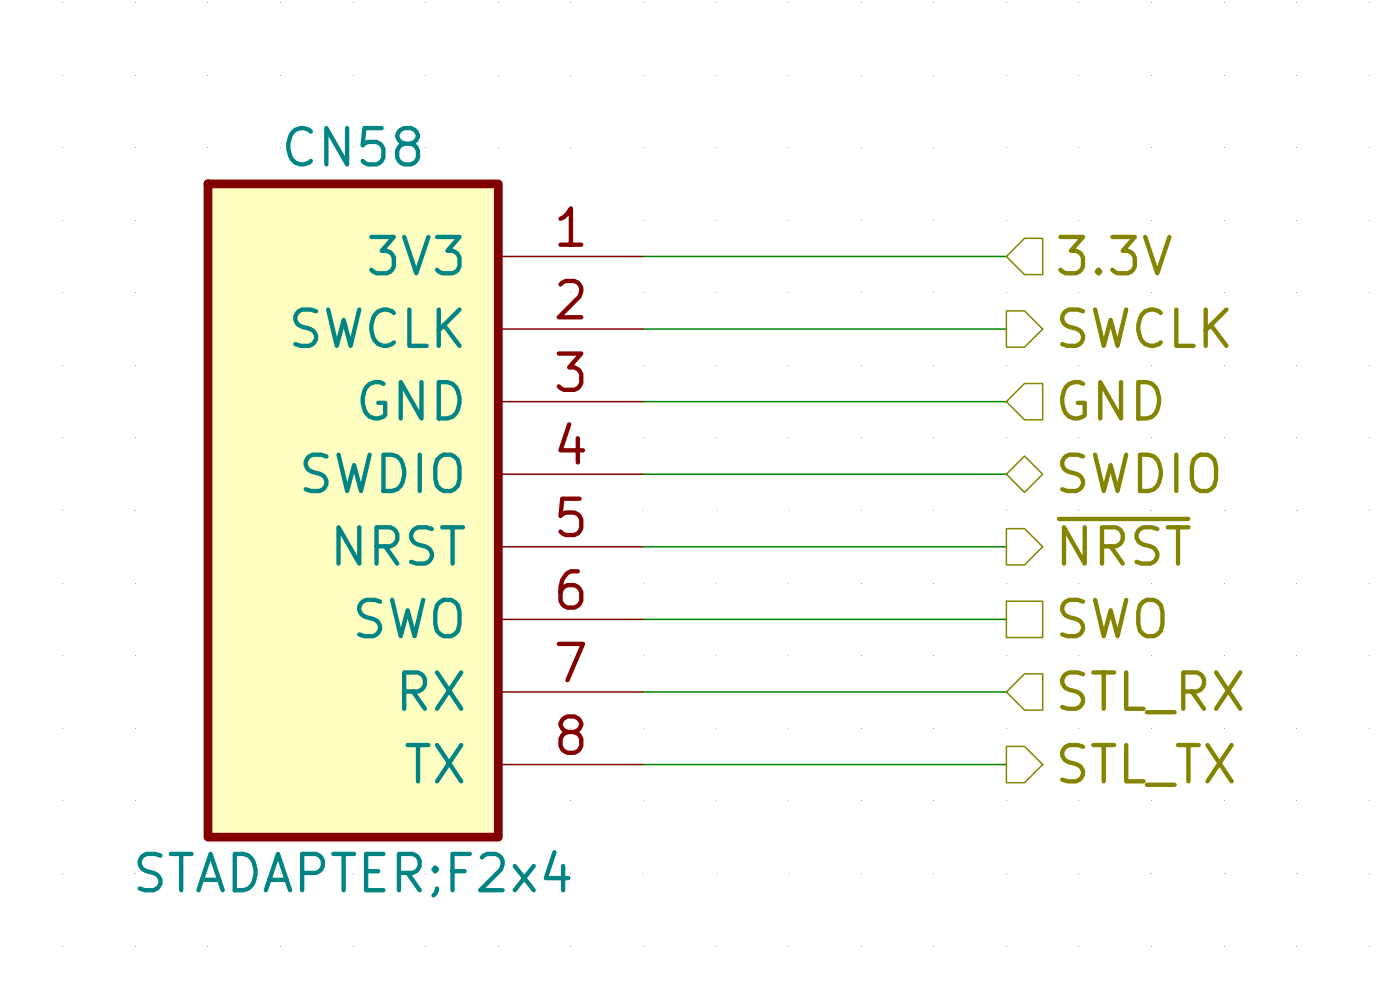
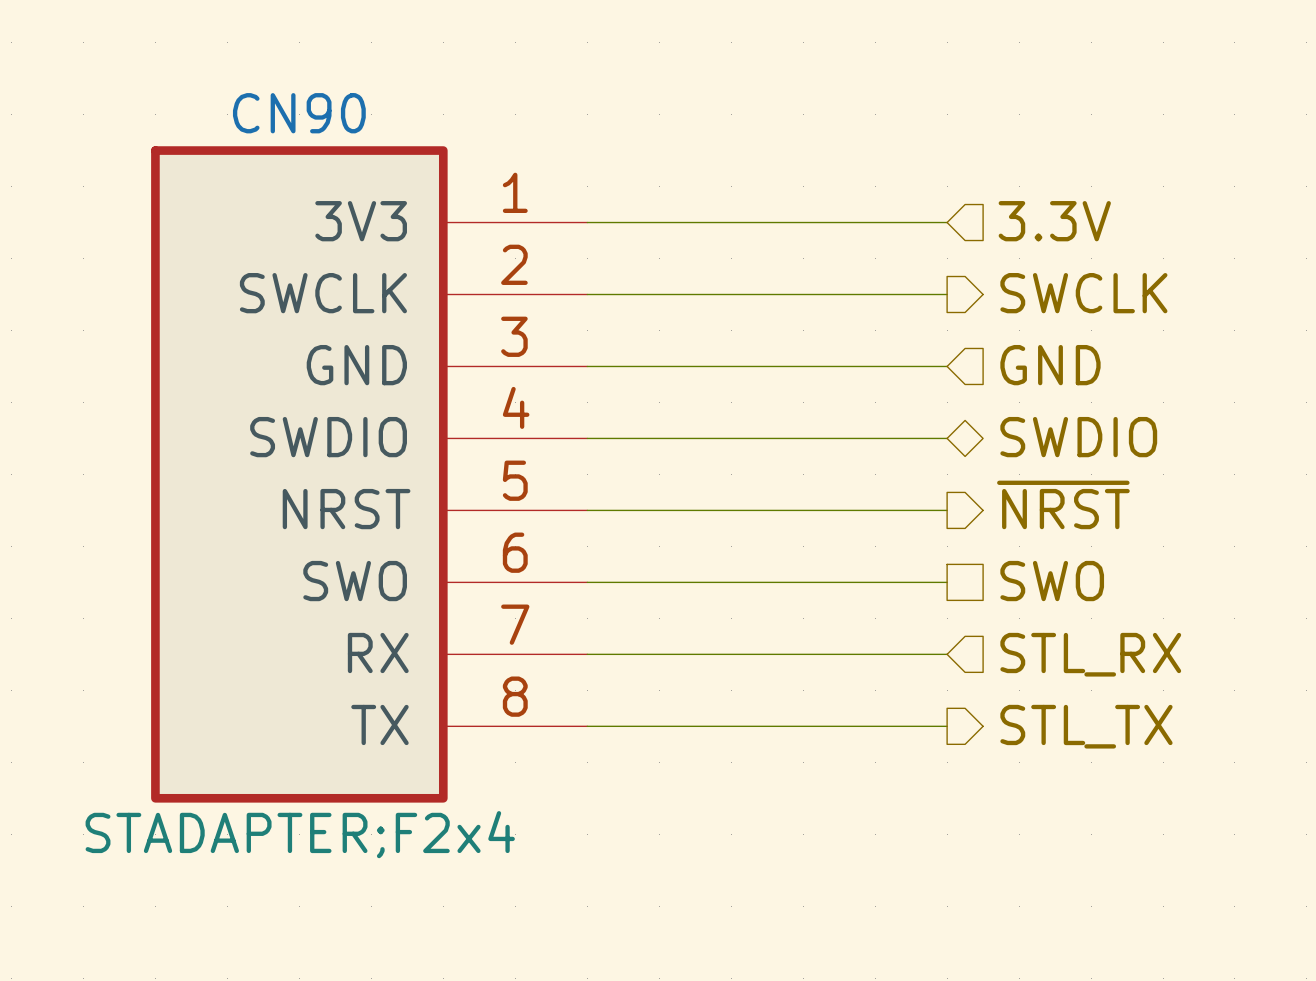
CN58 name: CN58 (353, 146) -> CN90 (299, 113)

